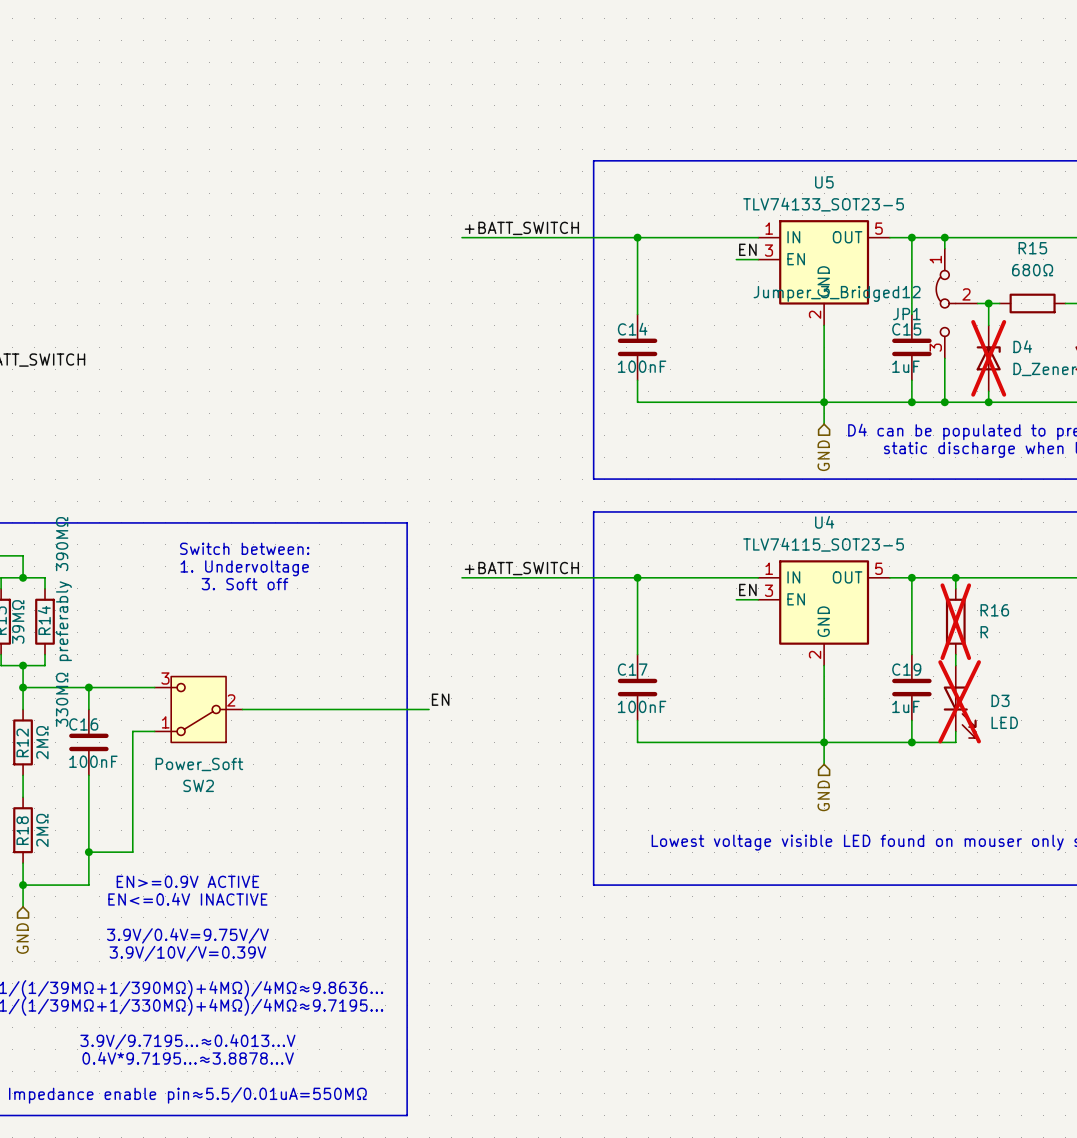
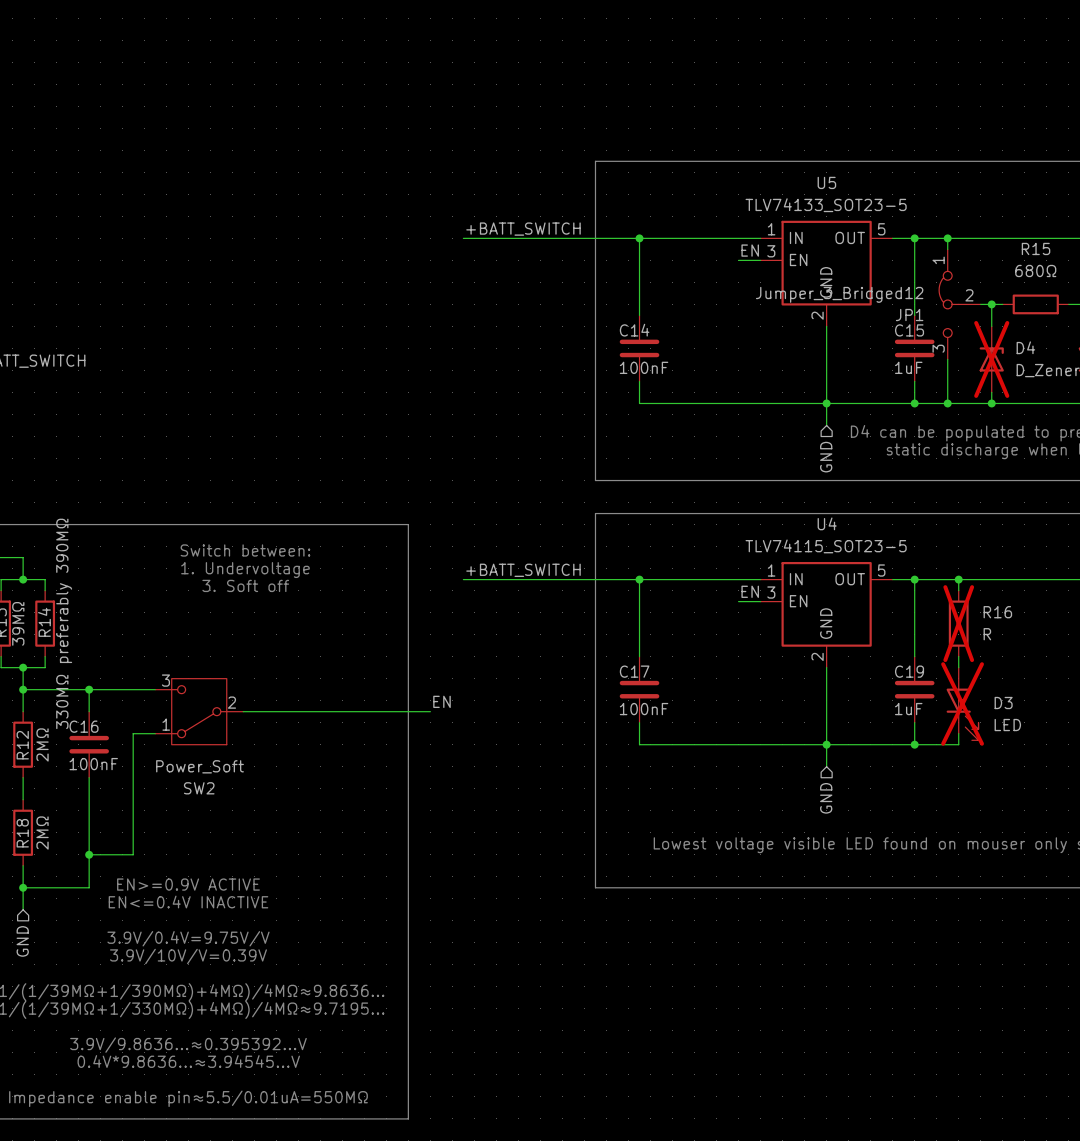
text: 3.9V/9.7195...≈0.4013...V (187, 1041) -> 3.9V/9.8636...≈0.395392...V (188, 1045)
text: 0.4V*9.7195...≈3.8878...V (188, 1058) -> 0.4V*9.8636...≈3.94545...V (188, 1061)

